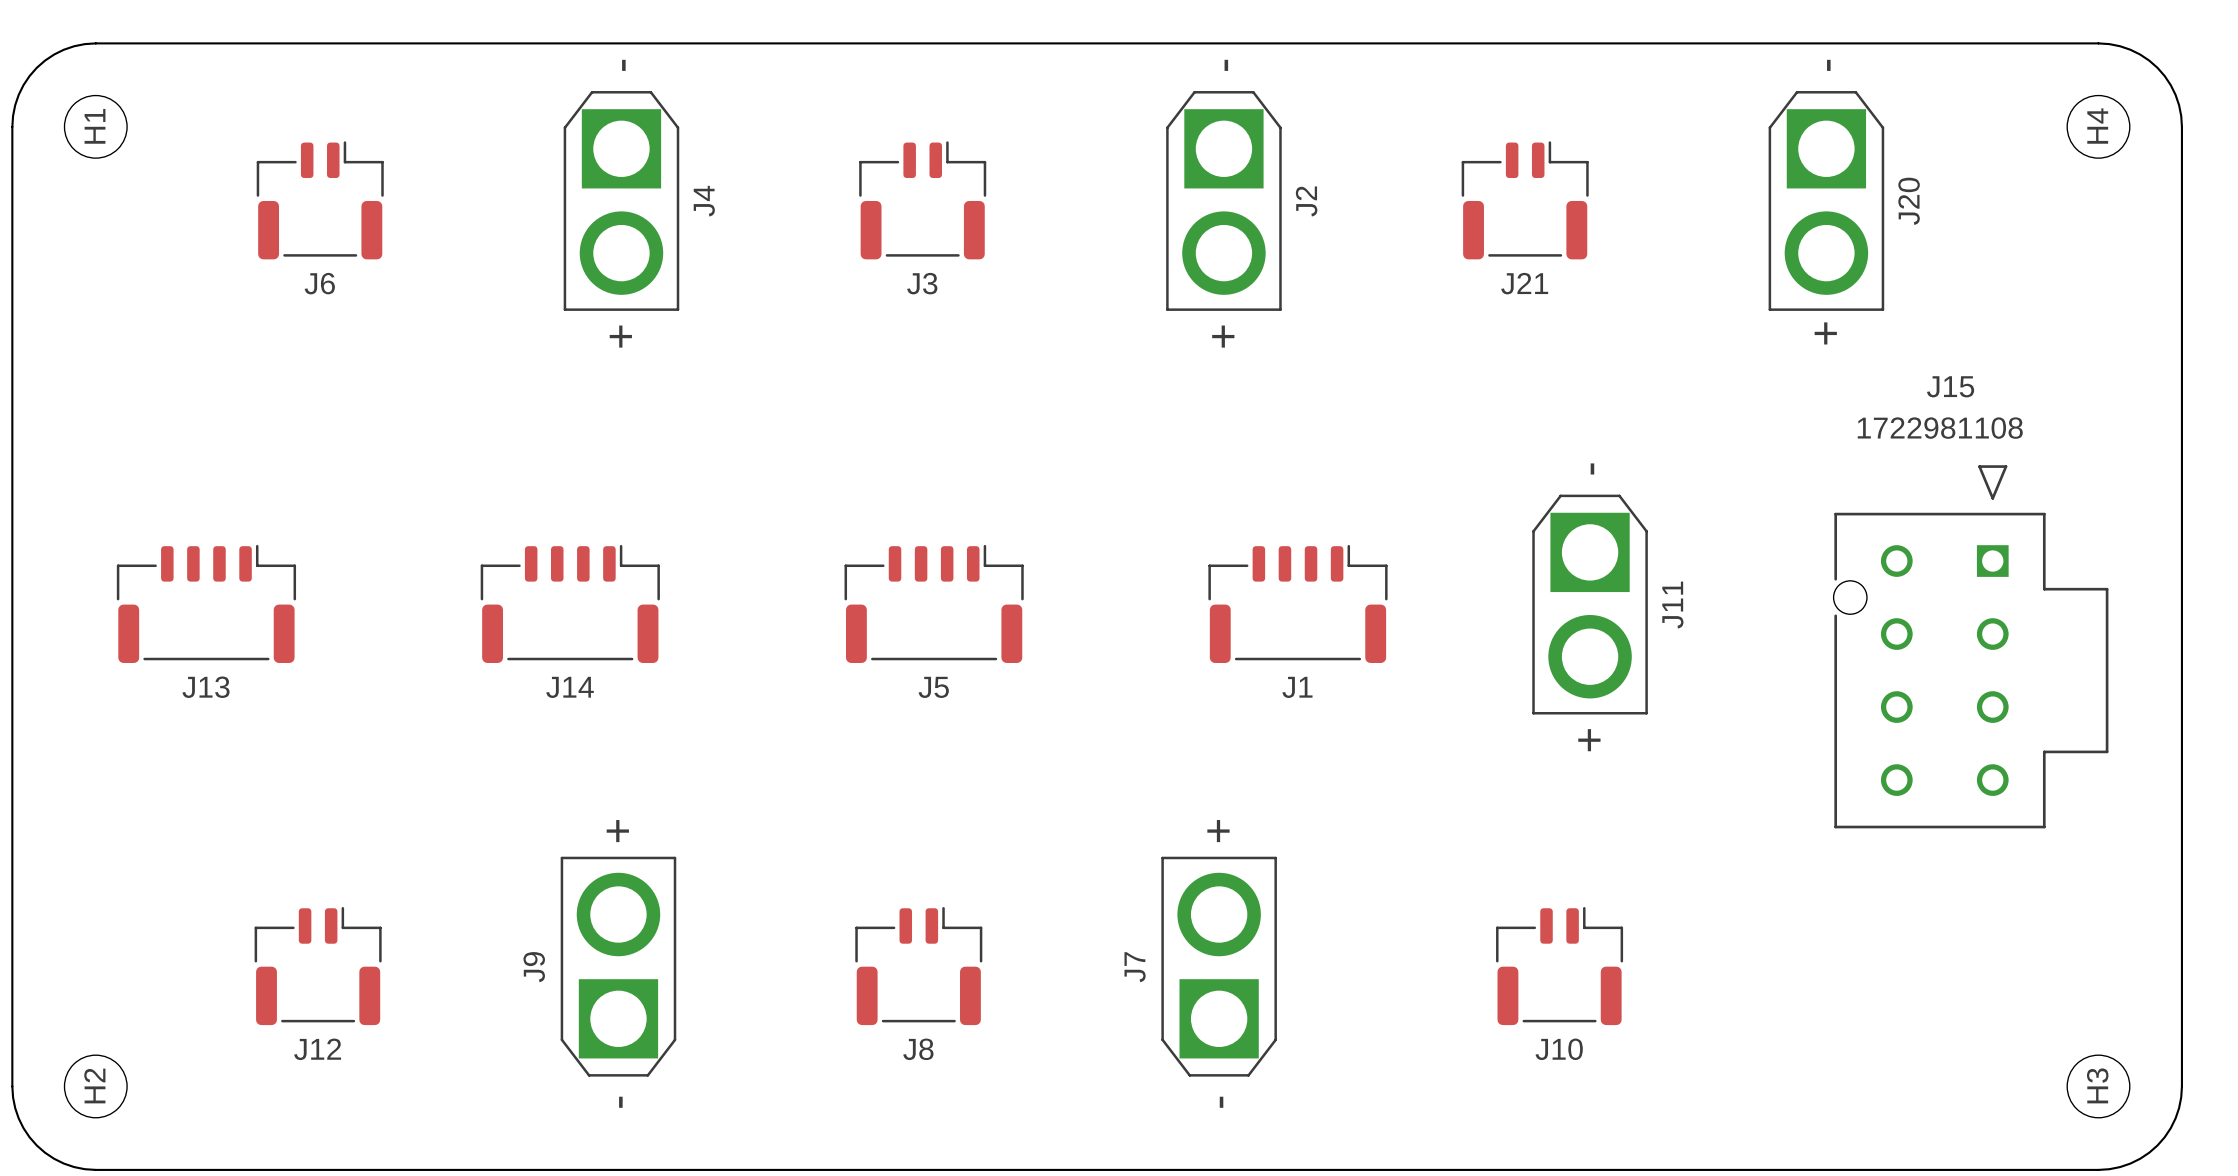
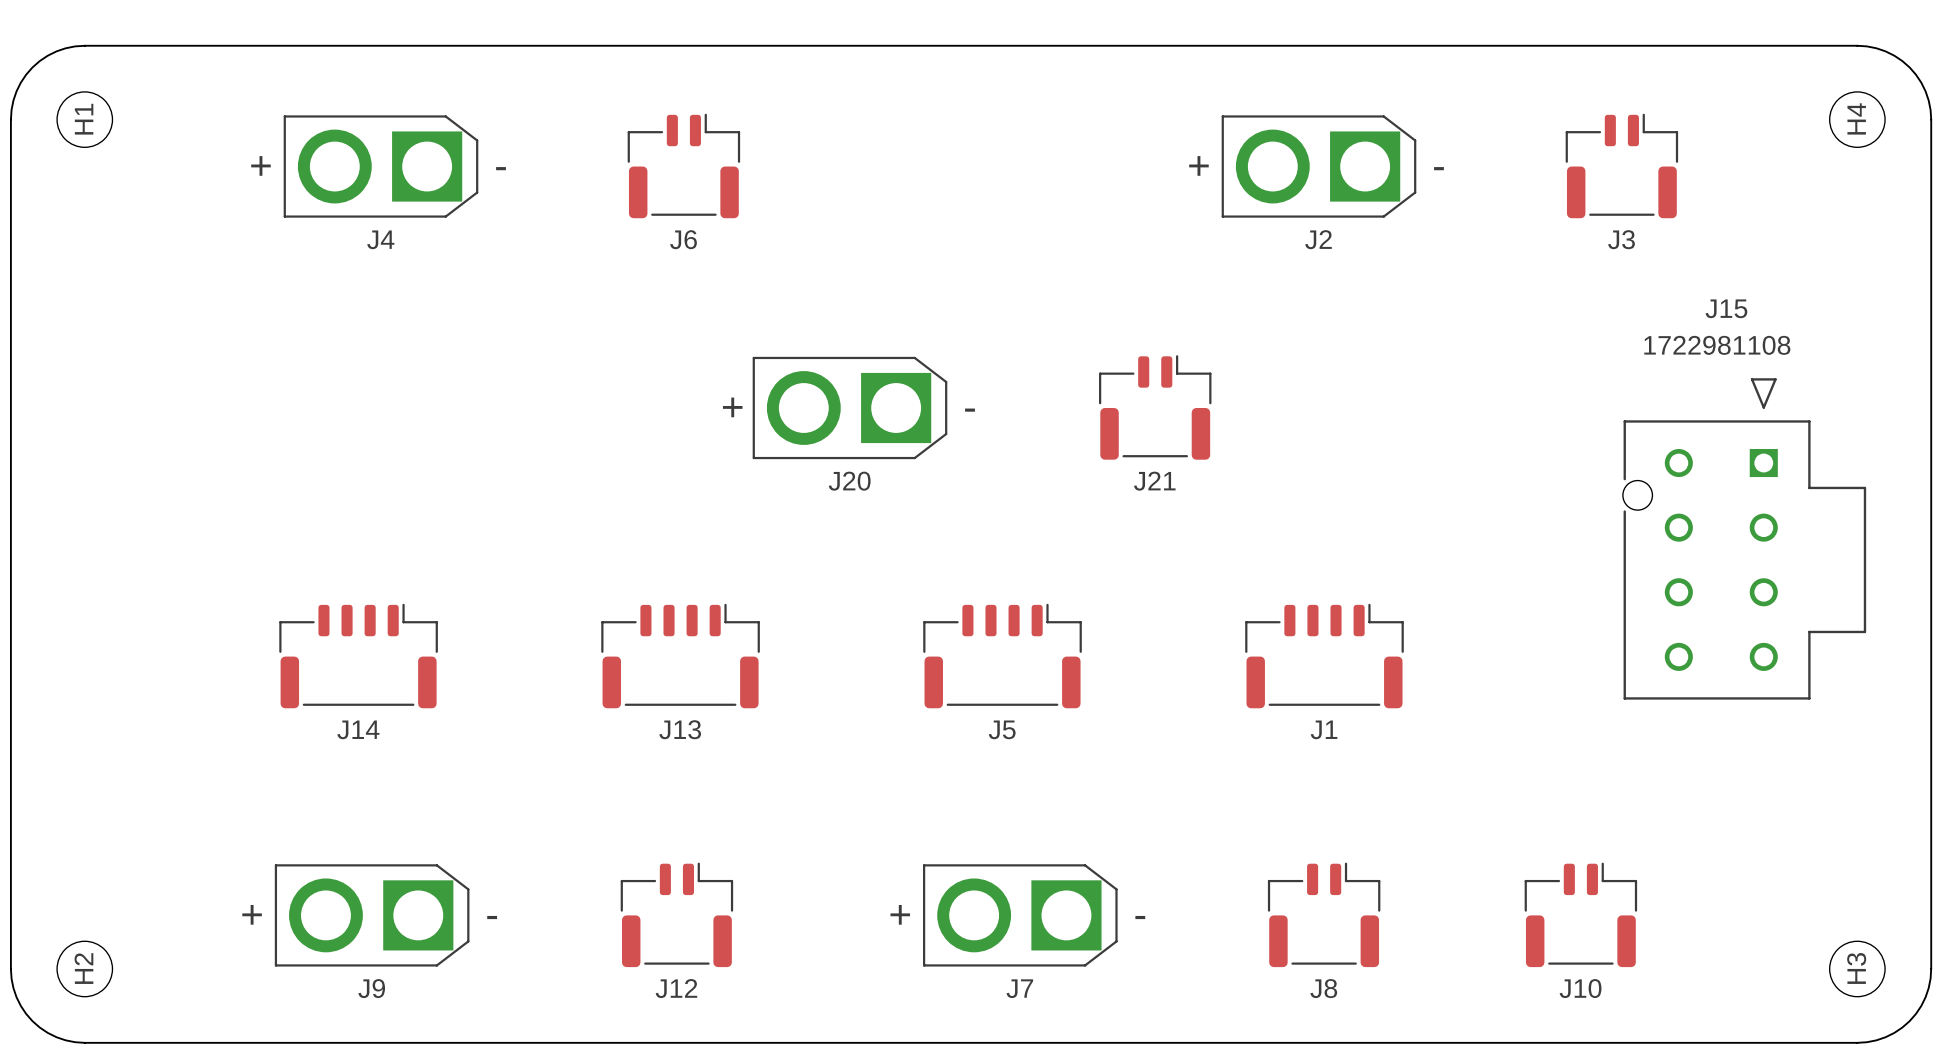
J6 position: (320, 200) -> (683, 165)
J4 rotation: 0° (621, 200) -> 90° clockwise (380, 166)
J4 position: (621, 200) -> (380, 166)
J3 position: (922, 200) -> (1621, 165)
J2 rotation: 0° (1223, 200) -> 90° clockwise (1318, 166)
J2 position: (1223, 200) -> (1318, 166)
J21 position: (1525, 200) -> (1155, 407)
J20 rotation: 0° (1826, 200) -> 90° clockwise (849, 408)
J20 position: (1826, 200) -> (849, 408)
J13 position: (206, 603) -> (680, 656)
J14 position: (570, 603) -> (358, 656)
J5 position: (934, 603) -> (1002, 656)
J1 position: (1297, 603) -> (1324, 656)
J11: (1590, 604) -> none
J15 position: (1971, 646) -> (1744, 538)
J12 position: (318, 966) -> (676, 914)
J9 rotation: 0° (618, 966) -> 90° counterclockwise (372, 915)
J9 position: (618, 966) -> (372, 915)
J8 position: (918, 966) -> (1324, 914)
J7 rotation: 0° (1219, 966) -> 90° counterclockwise (1020, 915)
J10 position: (1559, 966) -> (1580, 914)

